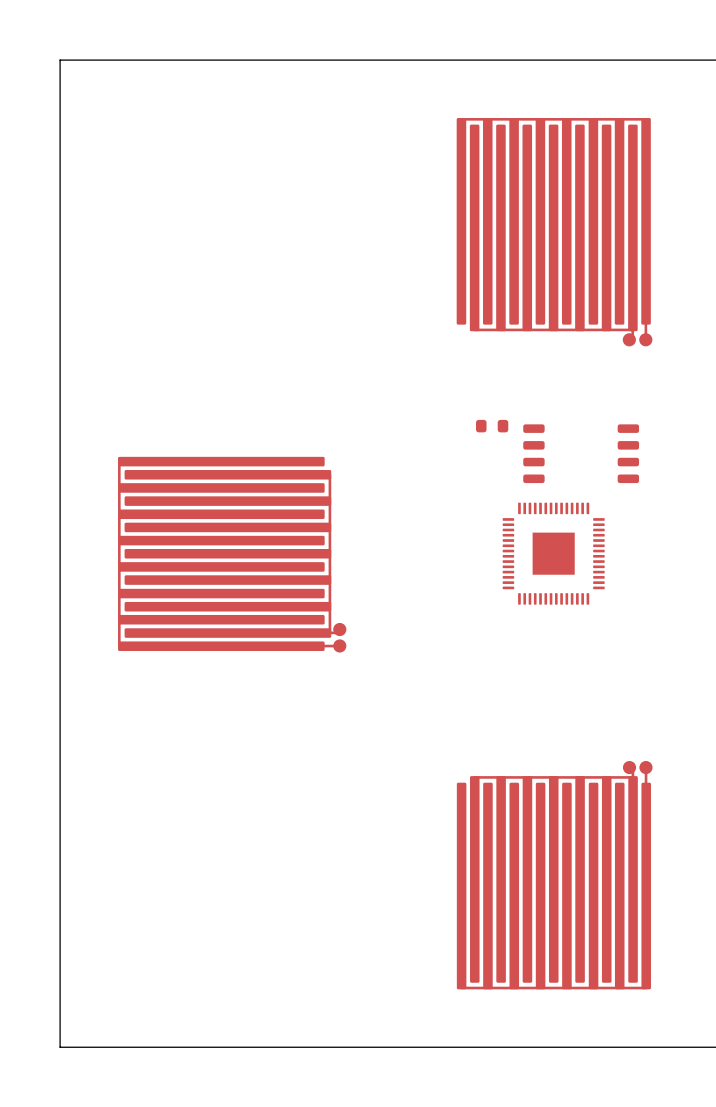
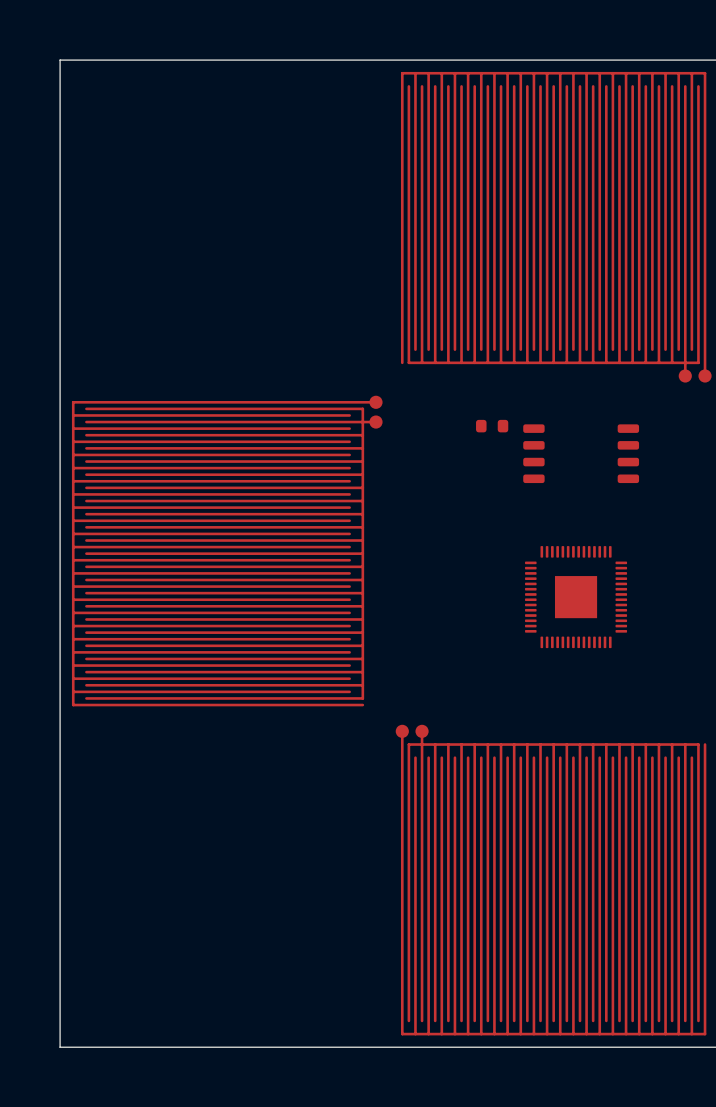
part footprint: [456, 118, 653, 347] -> [400, 71, 712, 383]
part footprint: [118, 456, 347, 653] -> [71, 395, 383, 707]
part position: (553, 553) -> (576, 597)
part footprint: [456, 760, 653, 990] -> [395, 724, 707, 1036]

